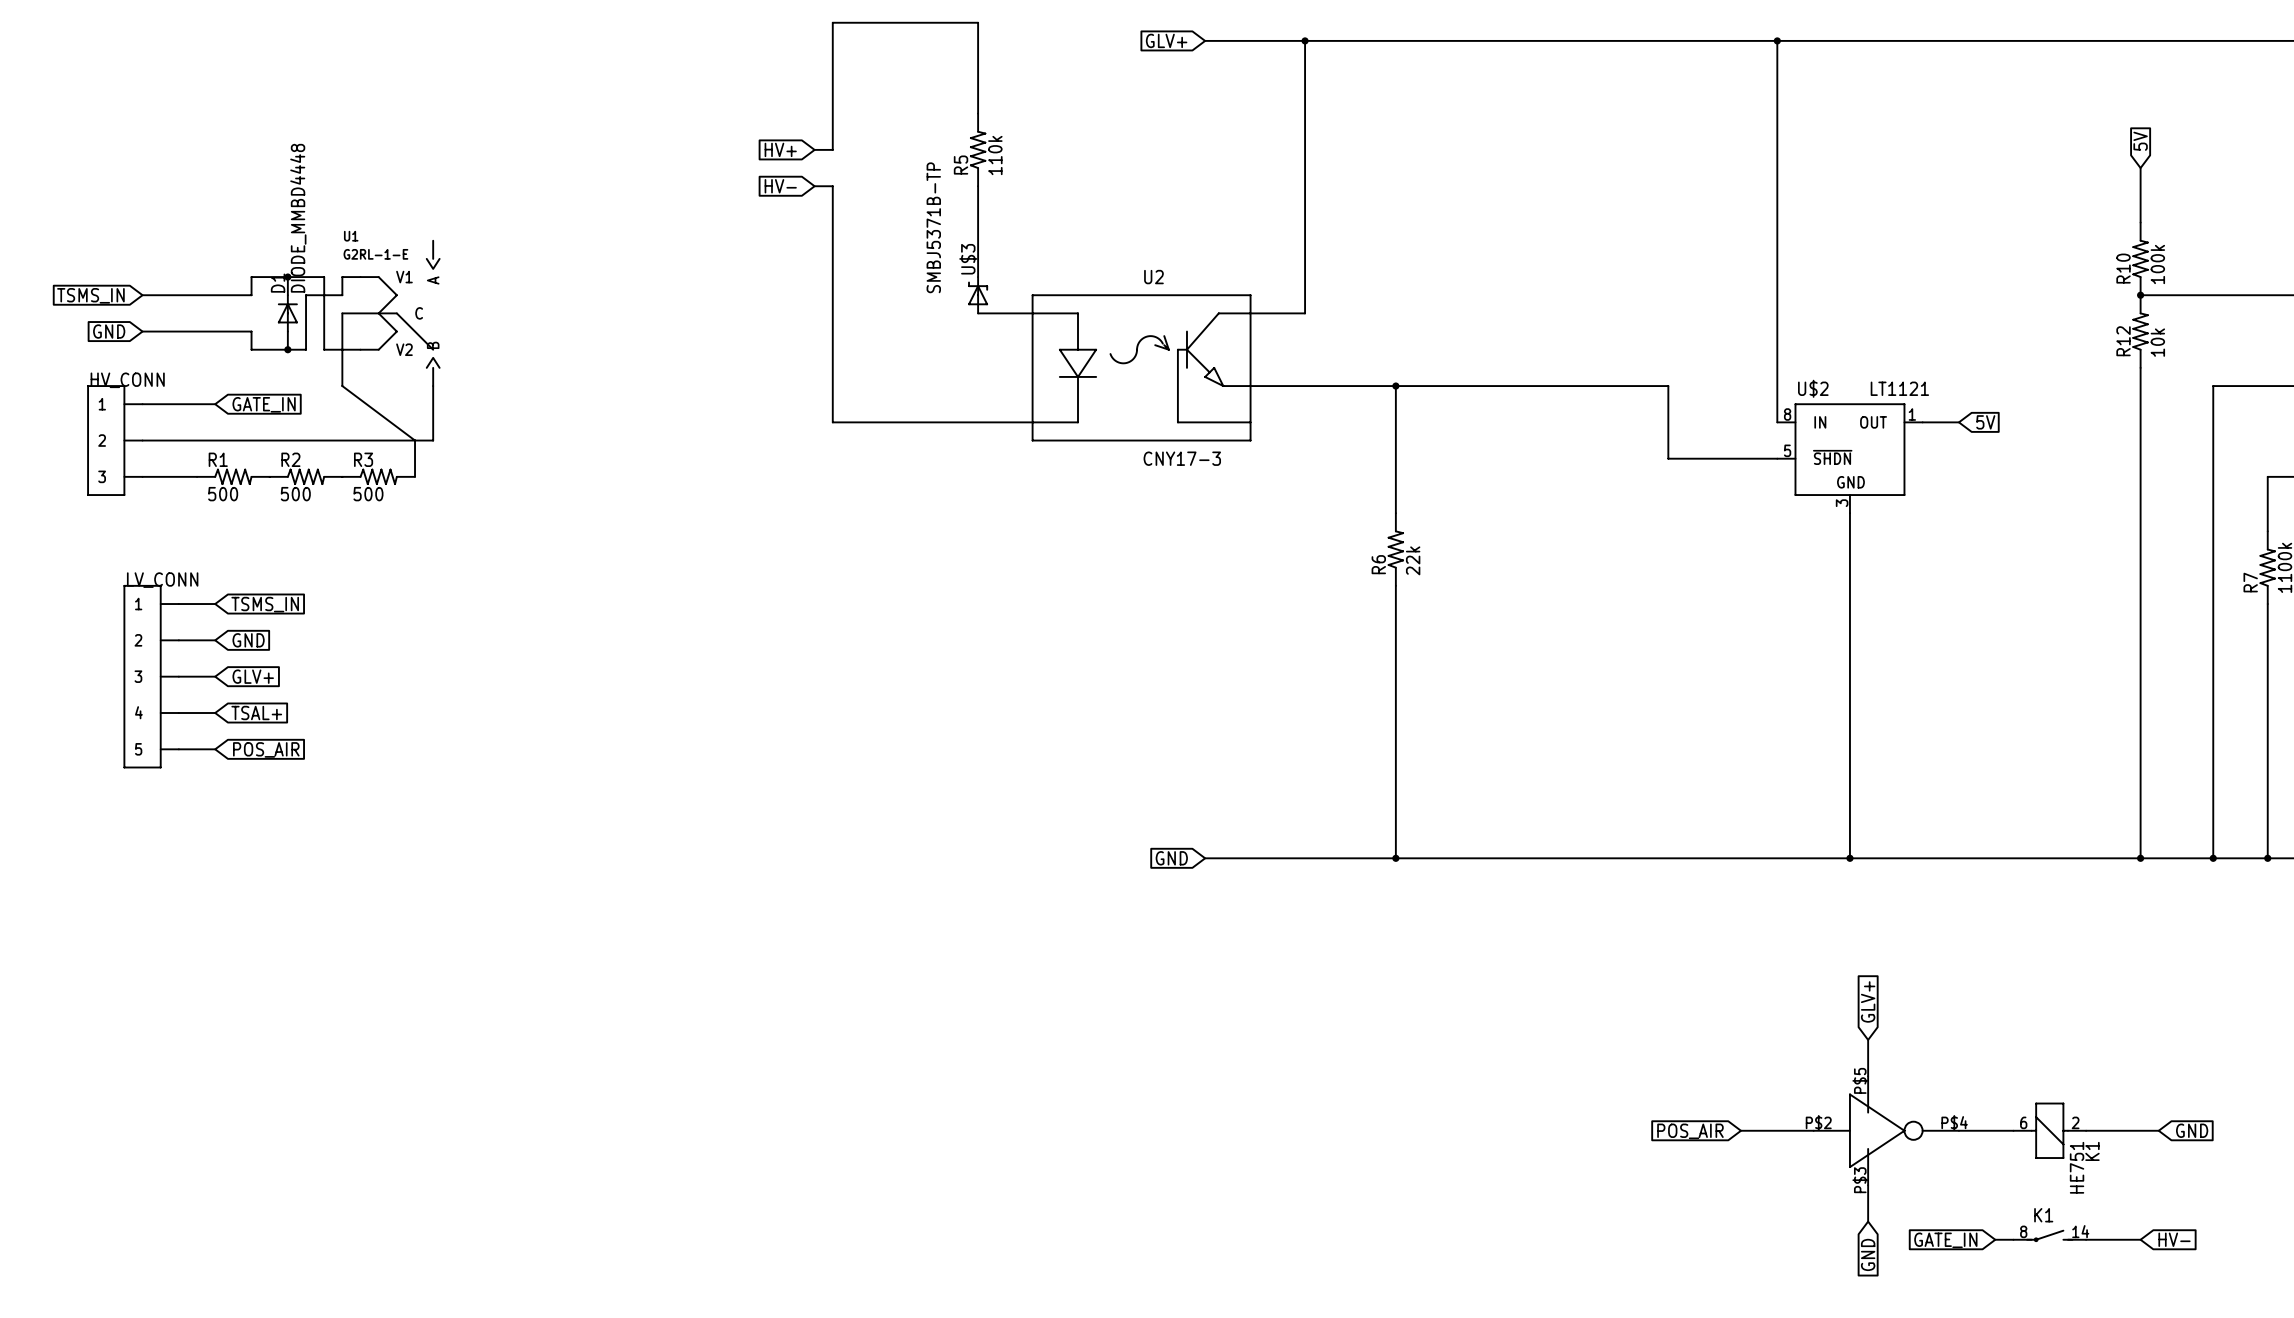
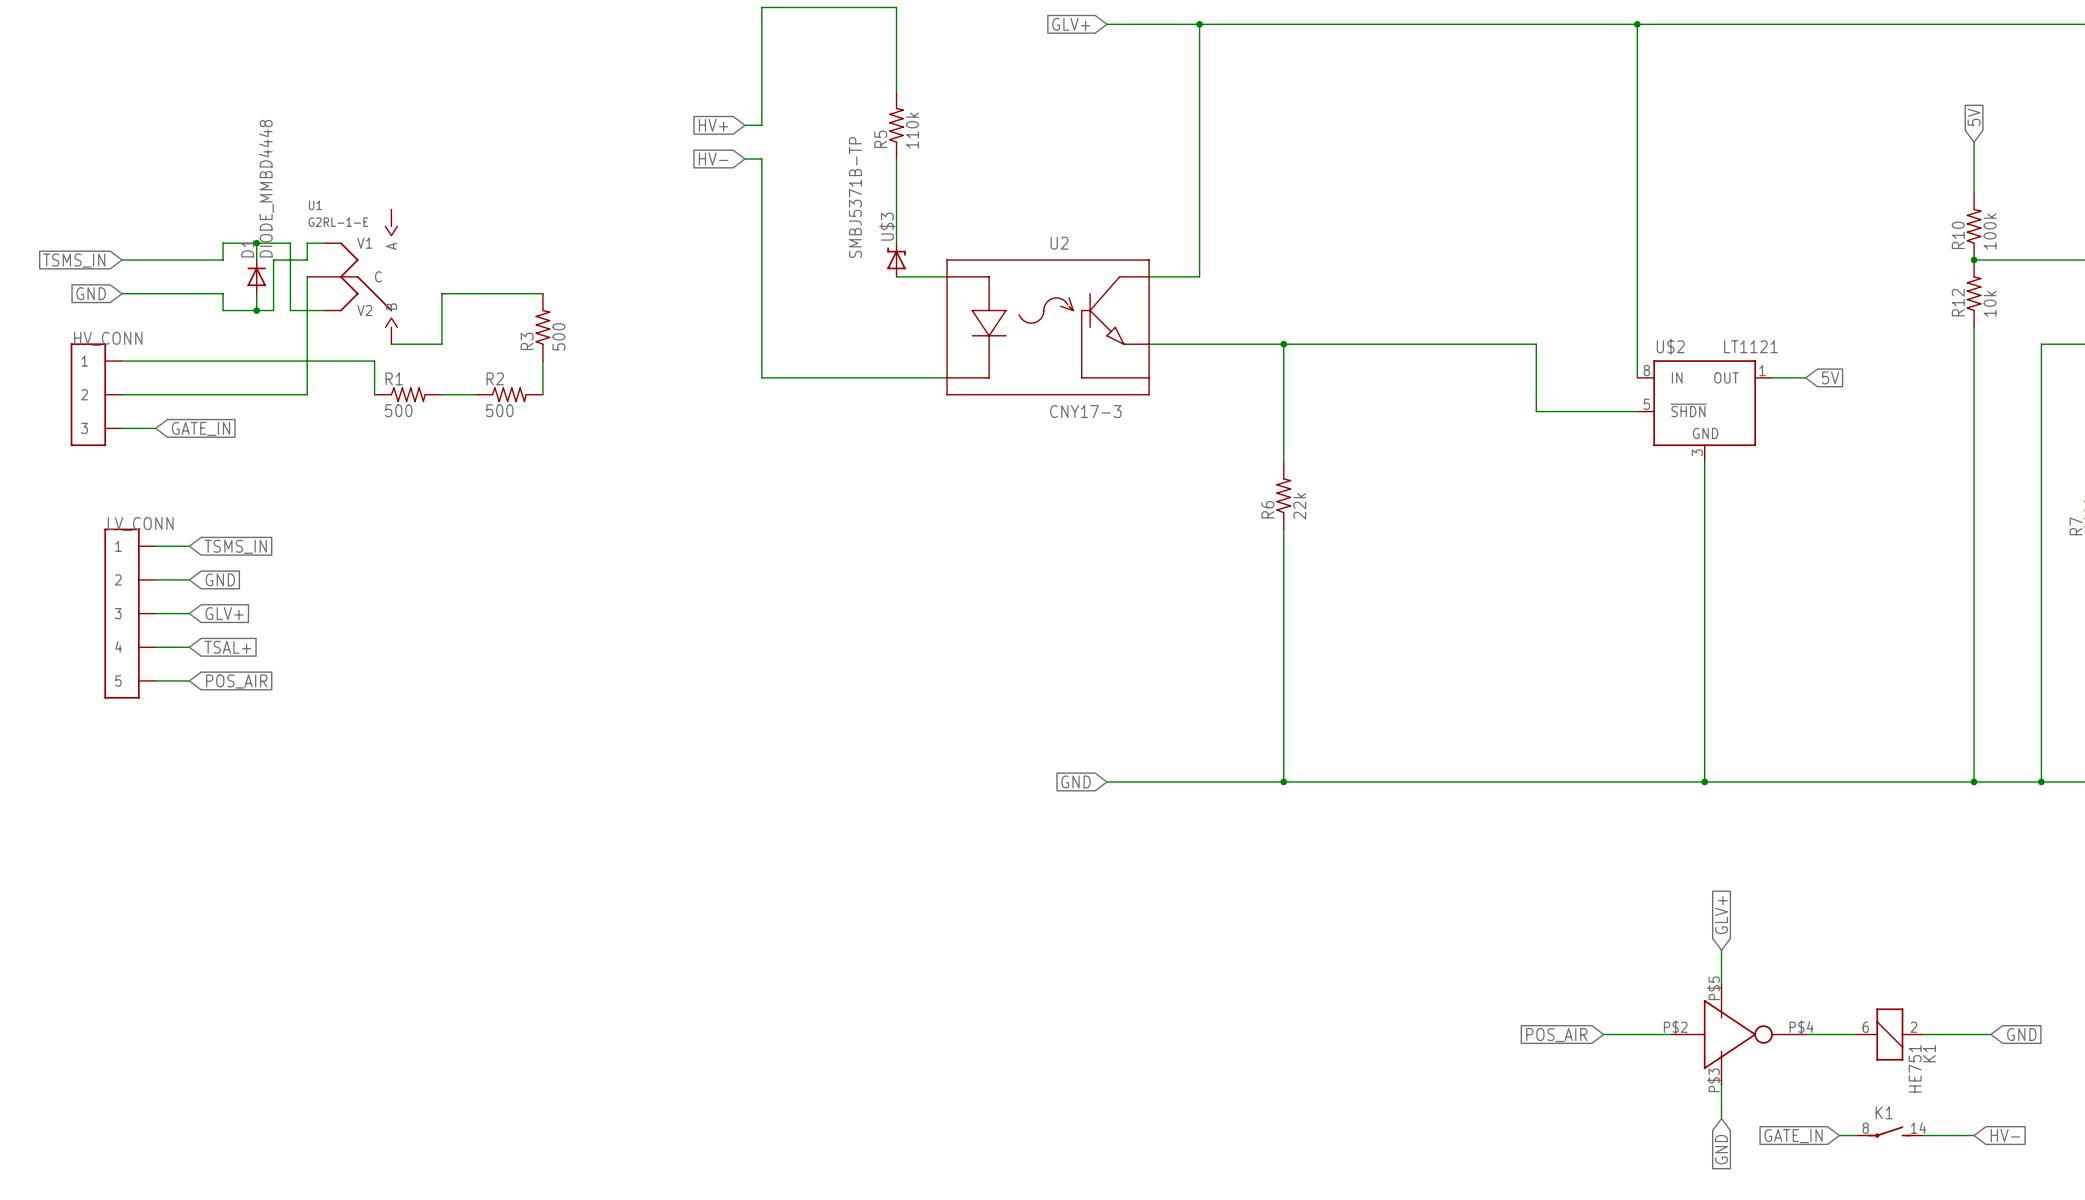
wire: (342, 386) (415, 440) (415, 476) -> (307, 344) (307, 394)
wire: (433, 386) (433, 440) (342, 440) -> (391, 344) (441, 344) (441, 293) (542, 293)
wire: none -> (189, 361) (374, 361) (374, 394)
global label position: GATE_IN (264, 404) -> GATE_IN (201, 428)
wire: none -> (542, 361) (542, 394)
wire: none -> (441, 394) (475, 394)
wire: (178, 476) (197, 476) -> none
R1 position: (233, 476) -> (408, 394)
R2 position: (306, 476) -> (509, 394)
R3 rotation: 0° (378, 476) -> 90° counterclockwise (542, 327)
R3 position: (378, 476) -> (542, 327)

